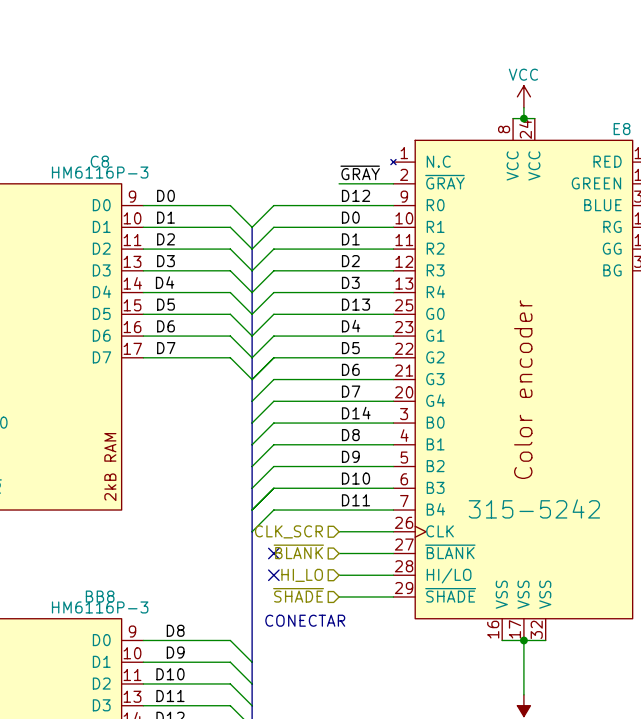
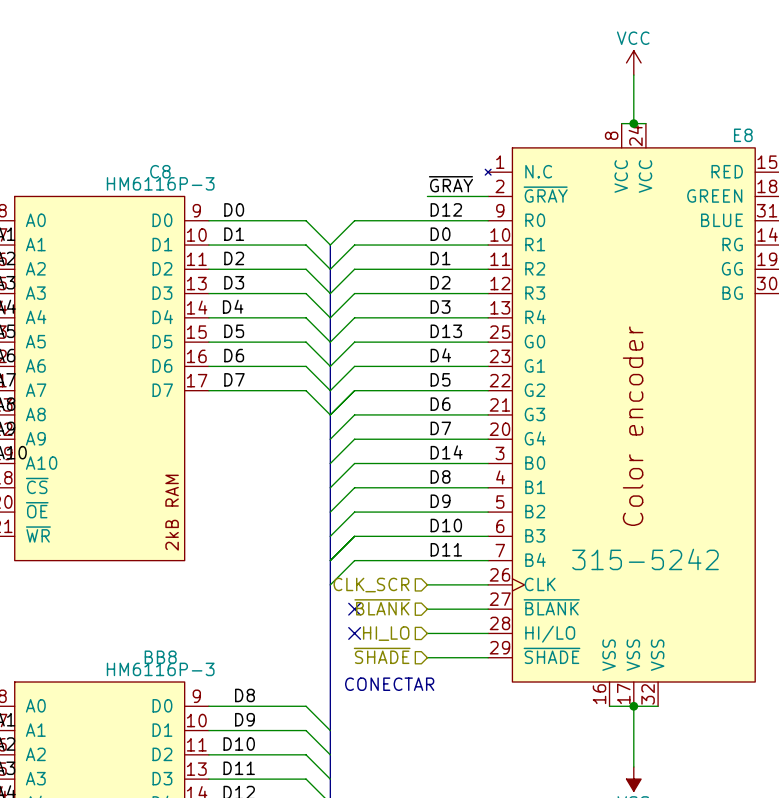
power symbol position: VCC (523, 96) -> VCC (633, 62)

